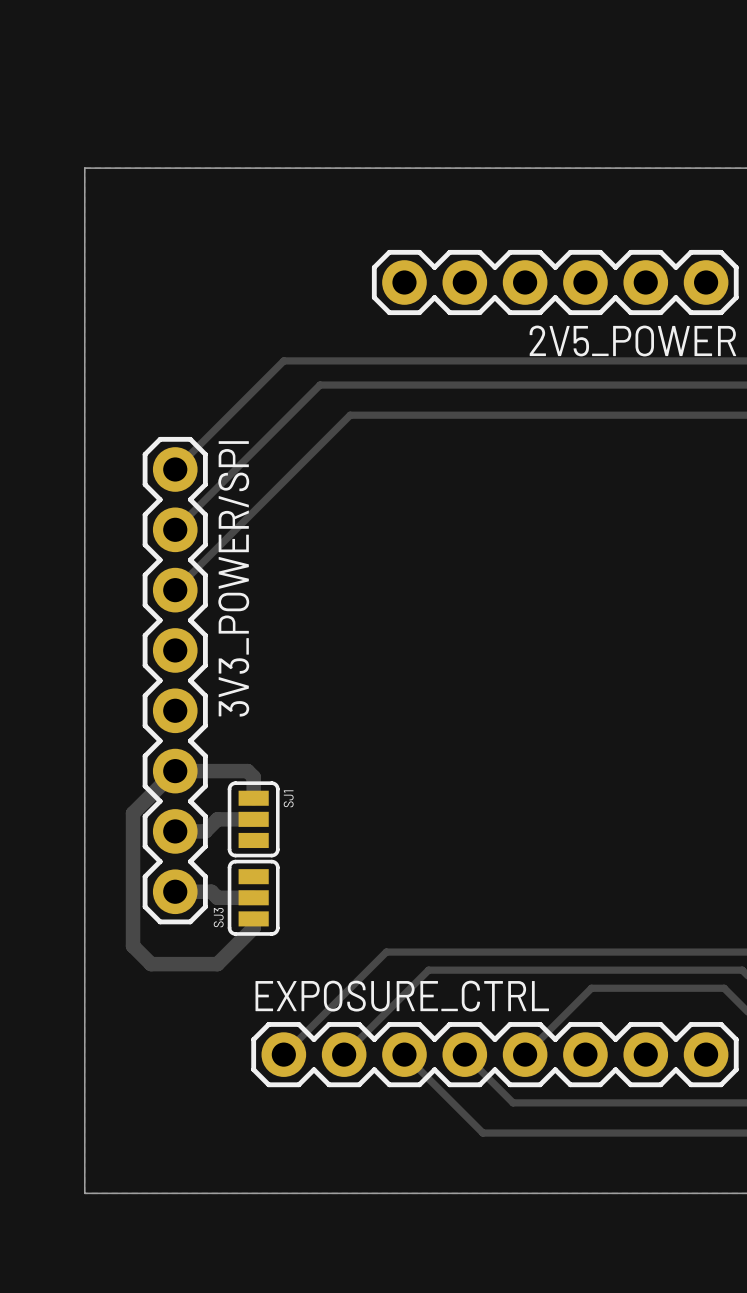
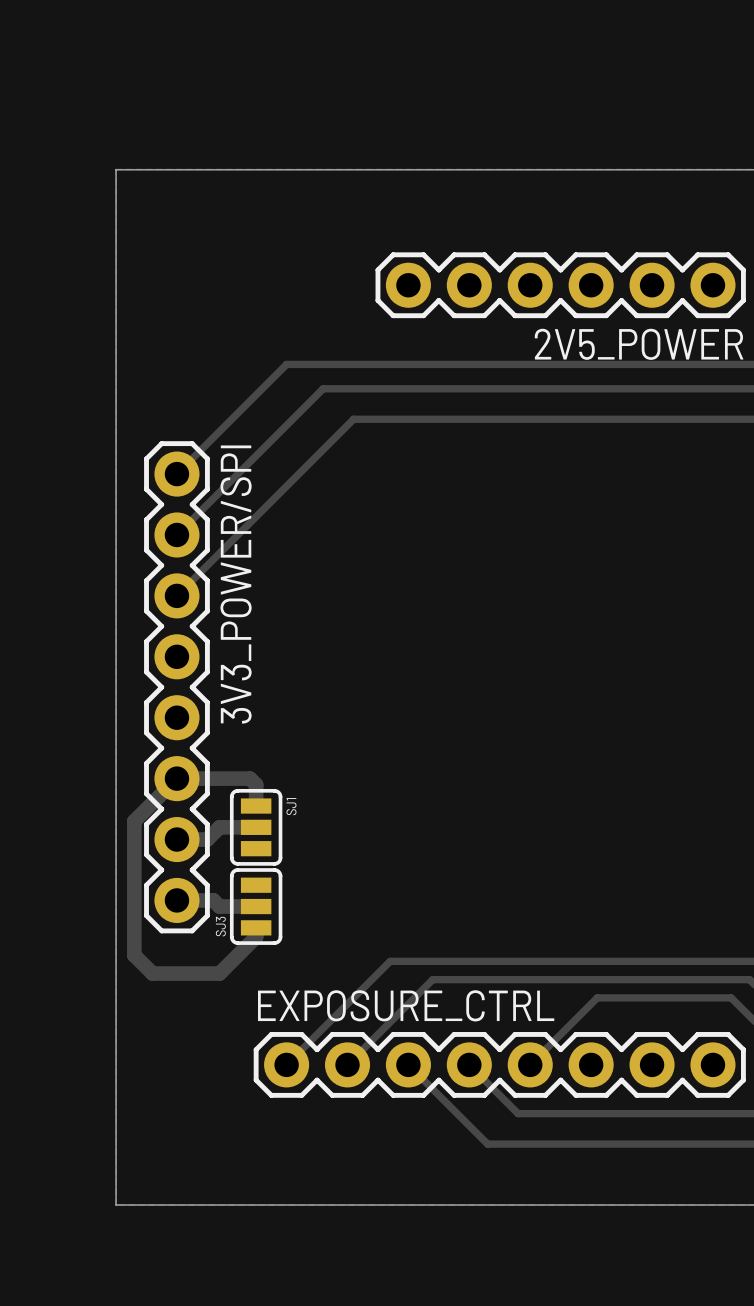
board edge: (114, 168) (84, 168) (84, 1193) (114, 1193) -> (116, 169) (116, 1205)

